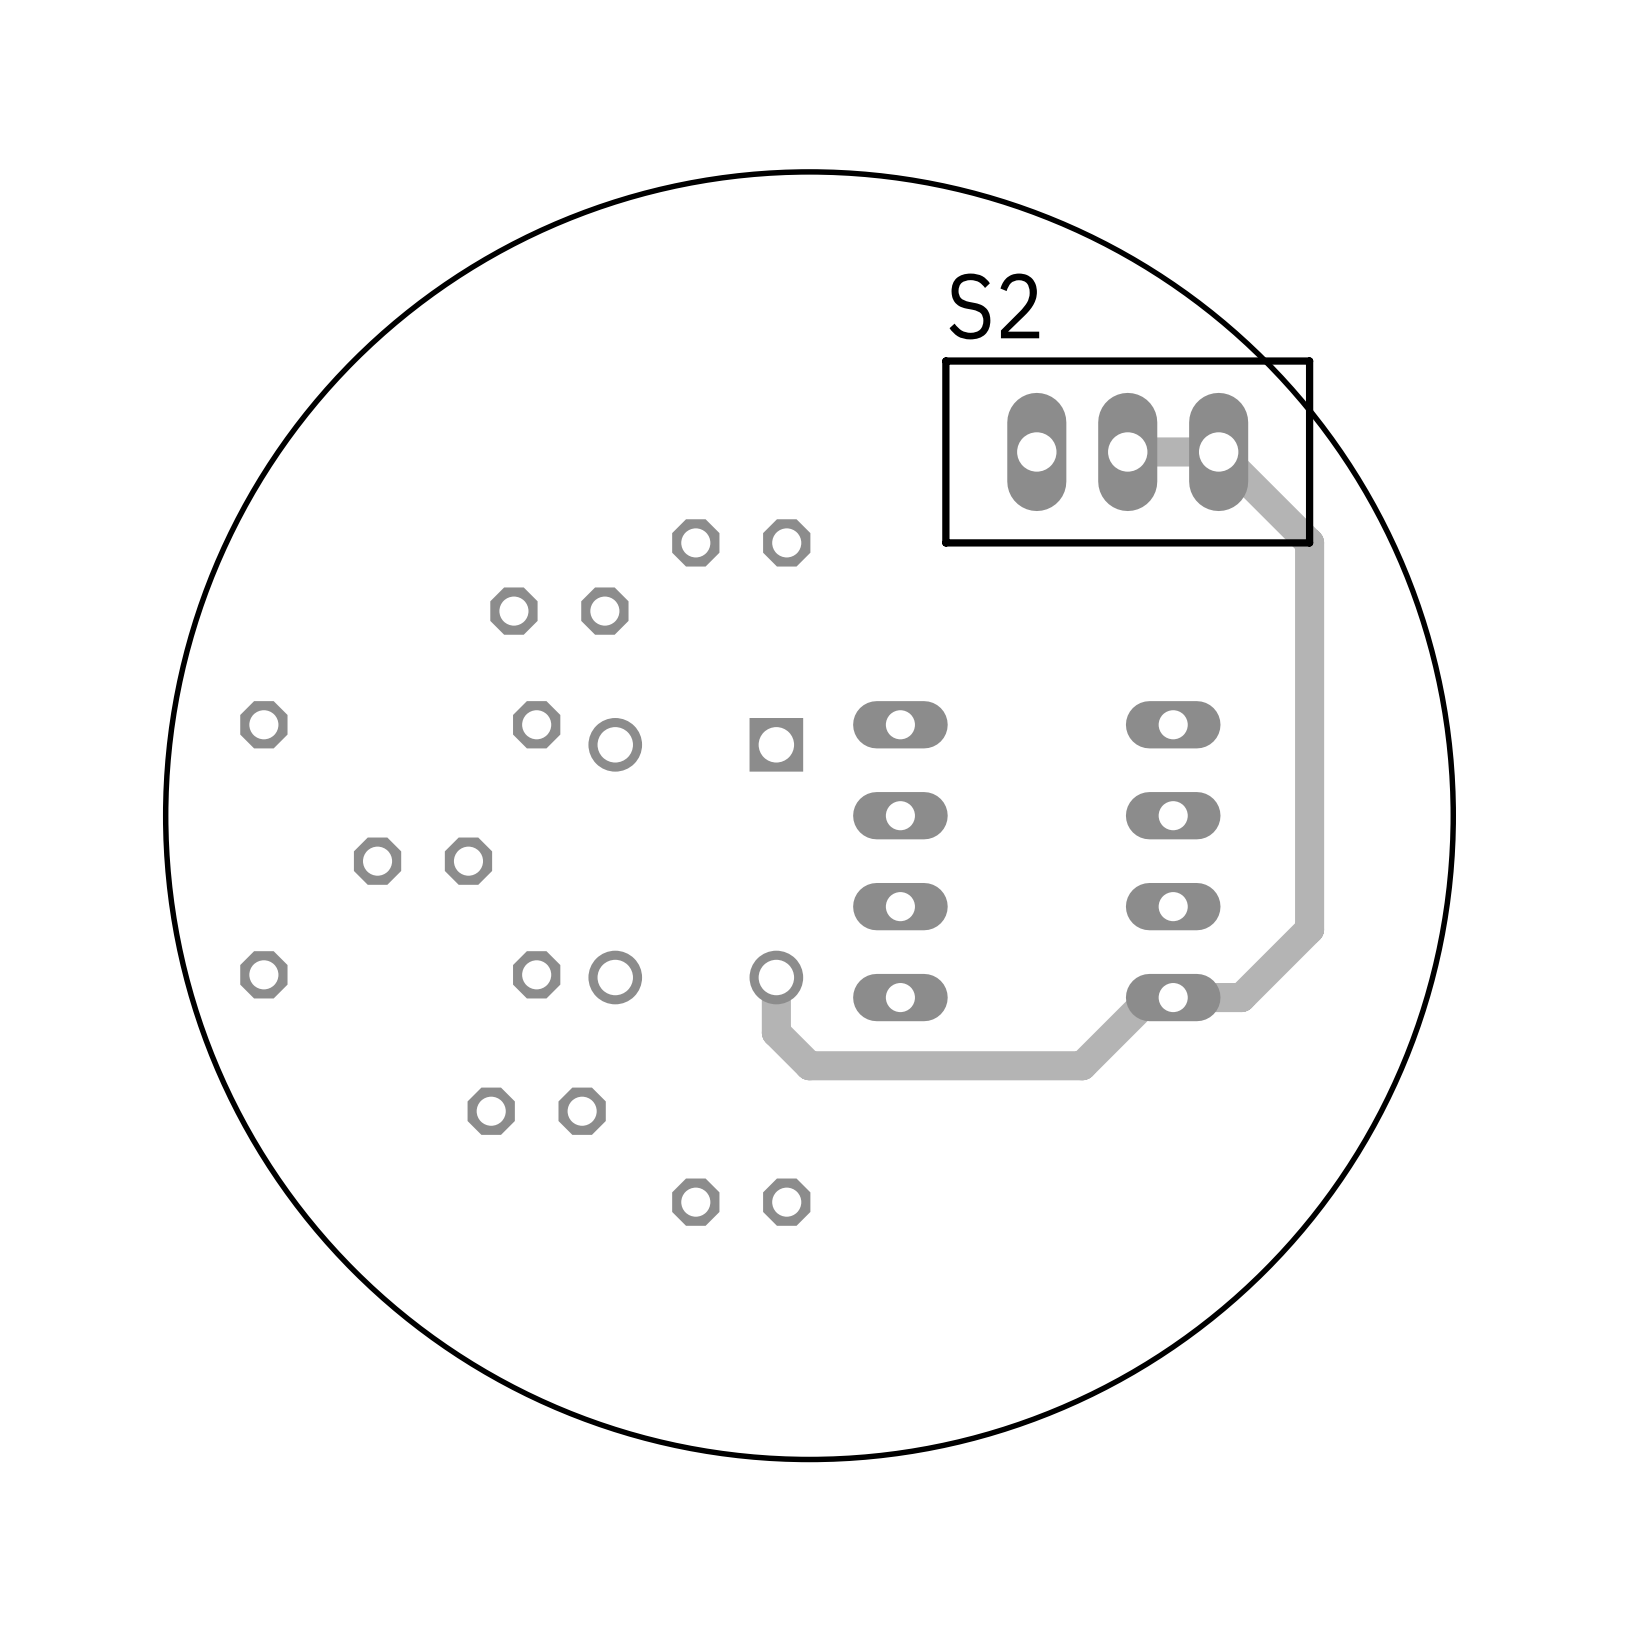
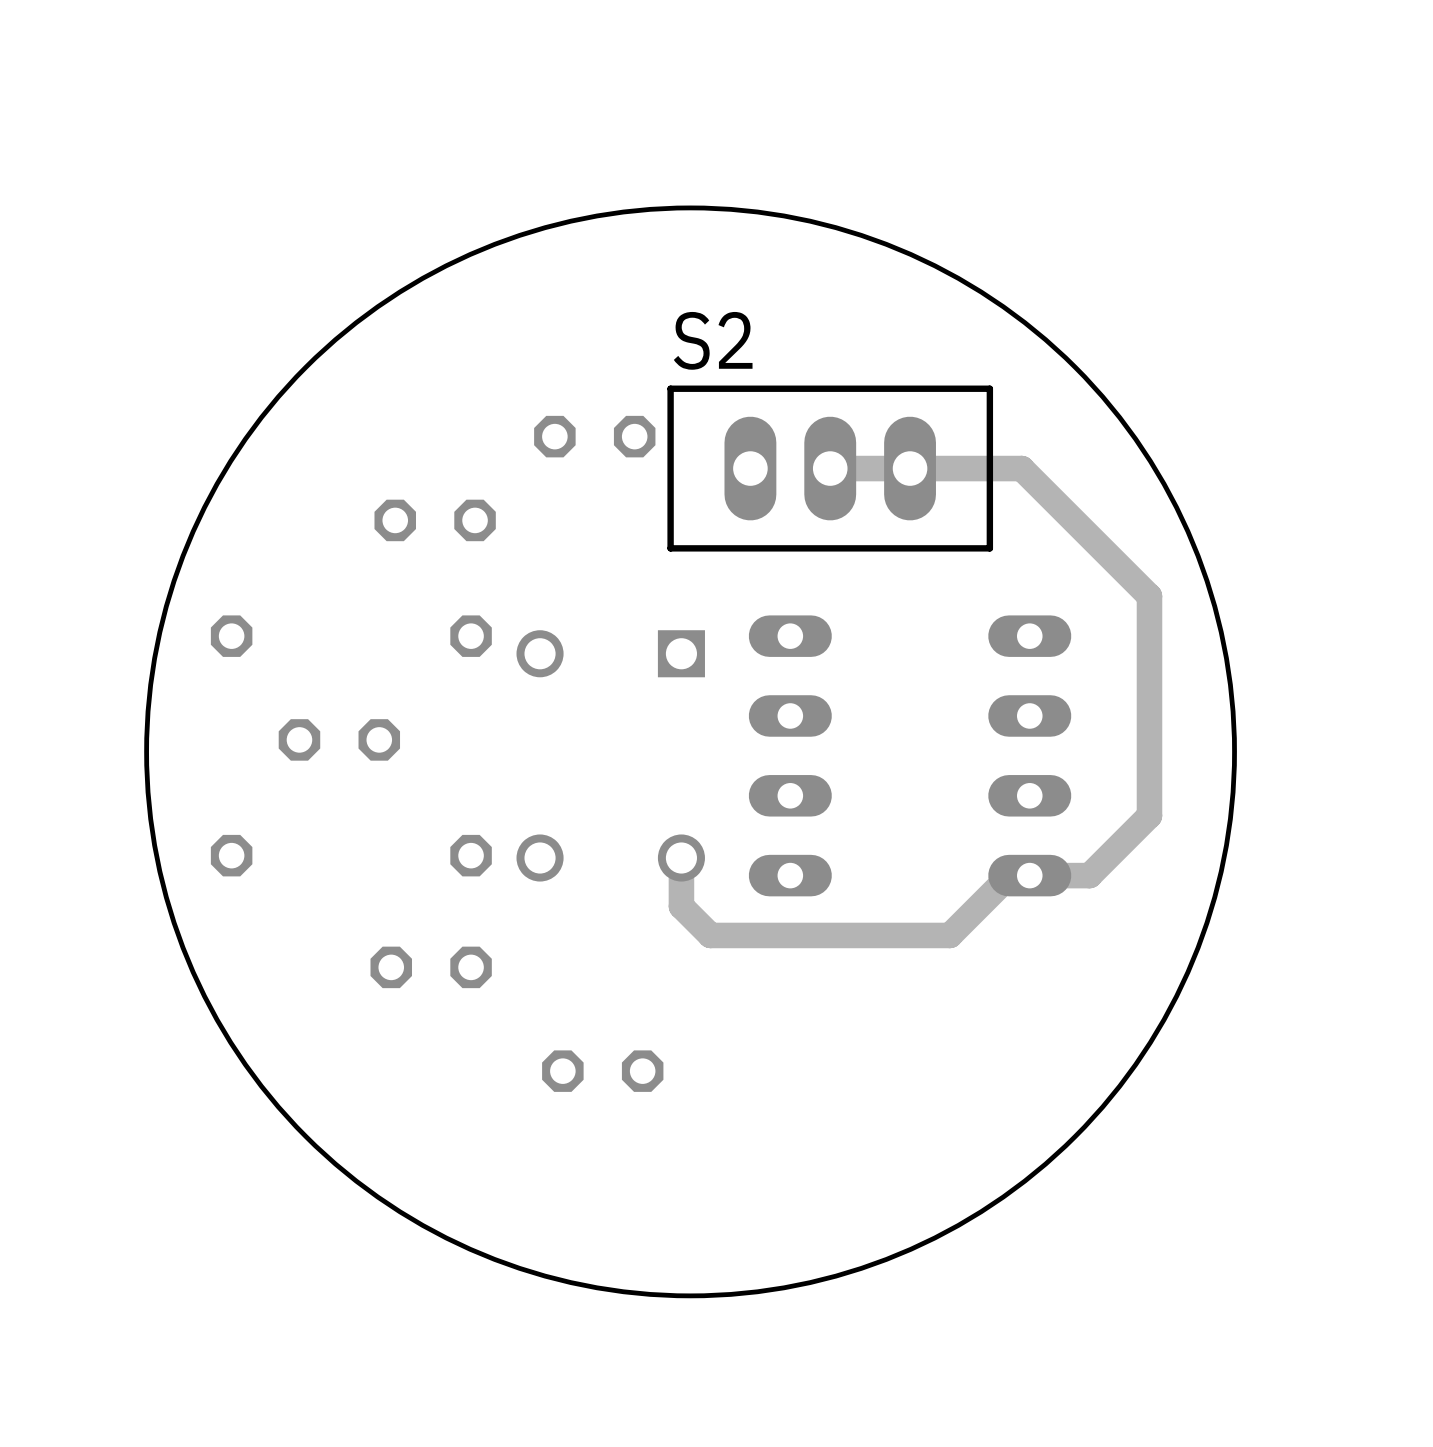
round board edge: [162, 169, 1456, 1463] -> none
round board edge: none -> [144, 205, 1237, 1299]
track: (1127, 451) (1218, 451) (1309, 542) (1309, 679) -> (830, 468) (1021, 468) (1149, 596)
S2 position: (1127, 451) -> (830, 468)
part position: (741, 542) -> (594, 436)
part position: (559, 611) -> (435, 520)
part position: (423, 861) -> (339, 739)
part position: (536, 1111) -> (431, 967)
part position: (741, 1202) -> (602, 1071)

